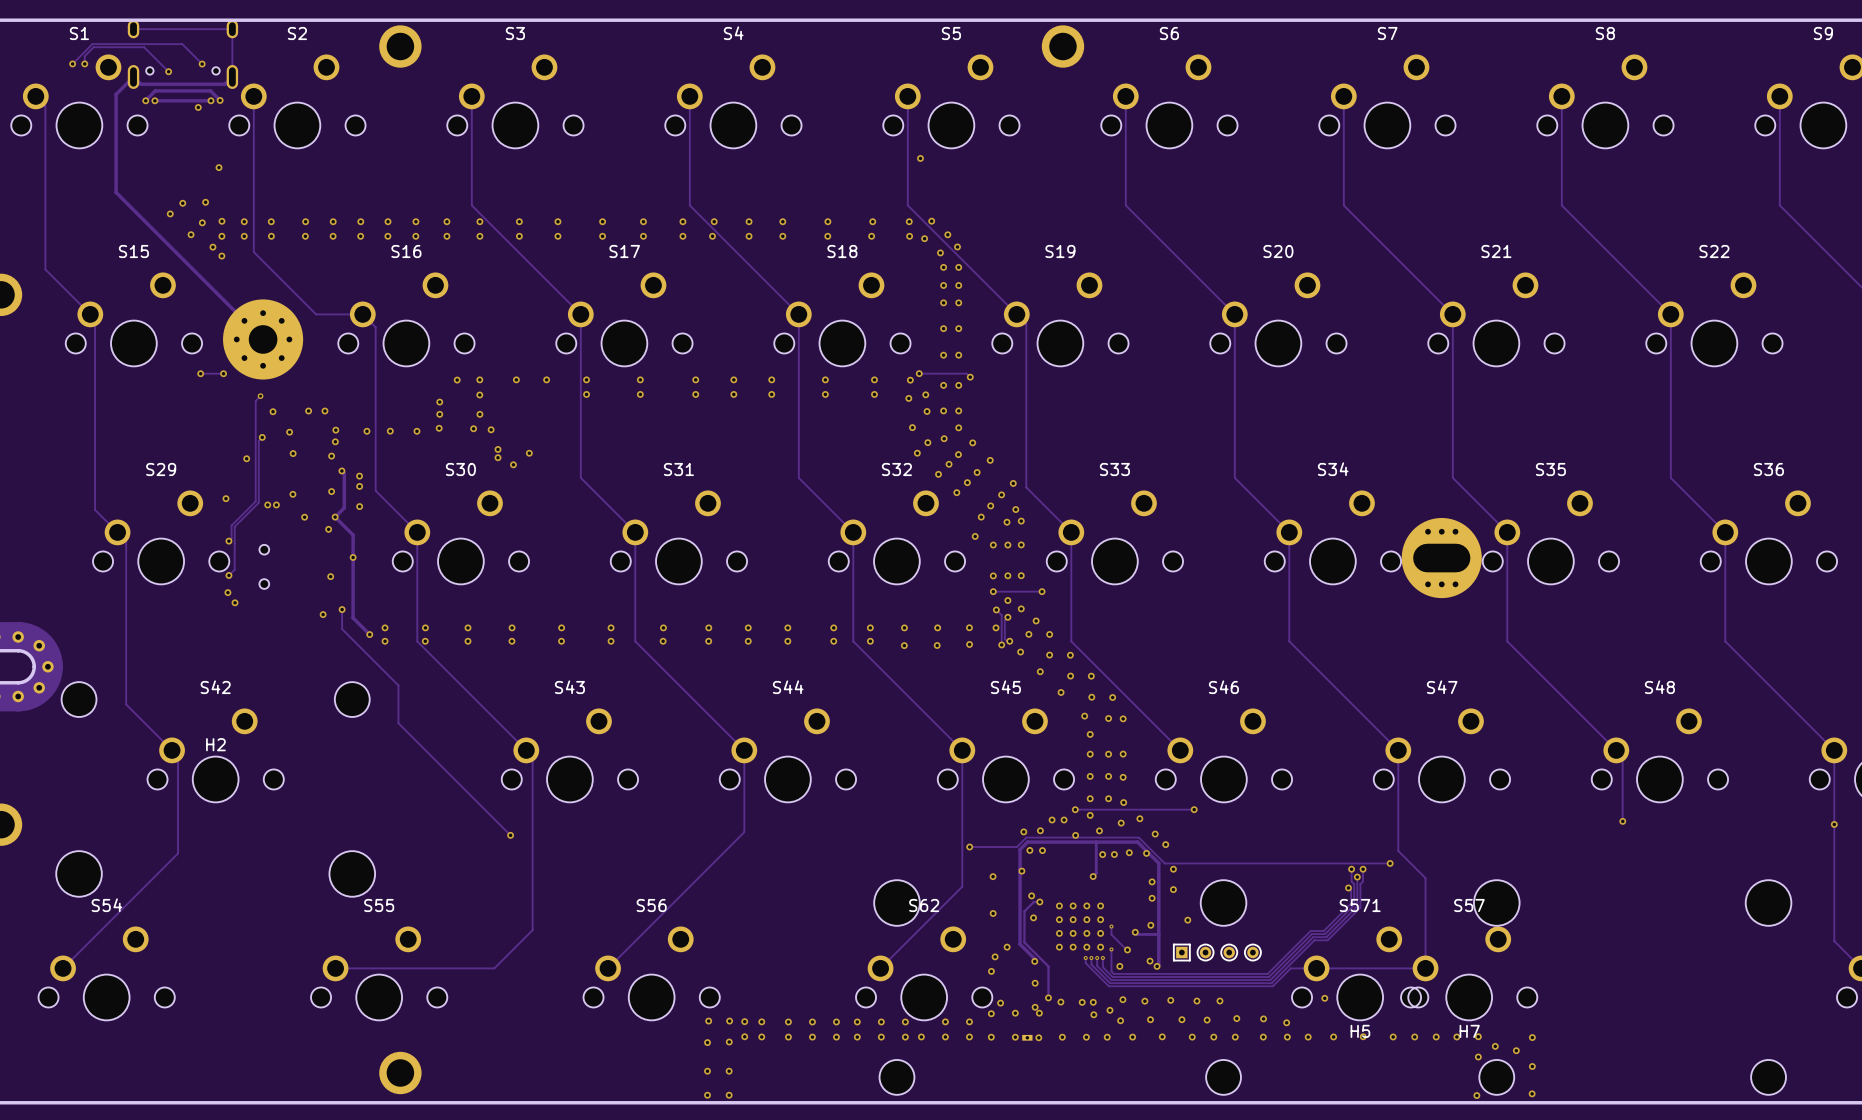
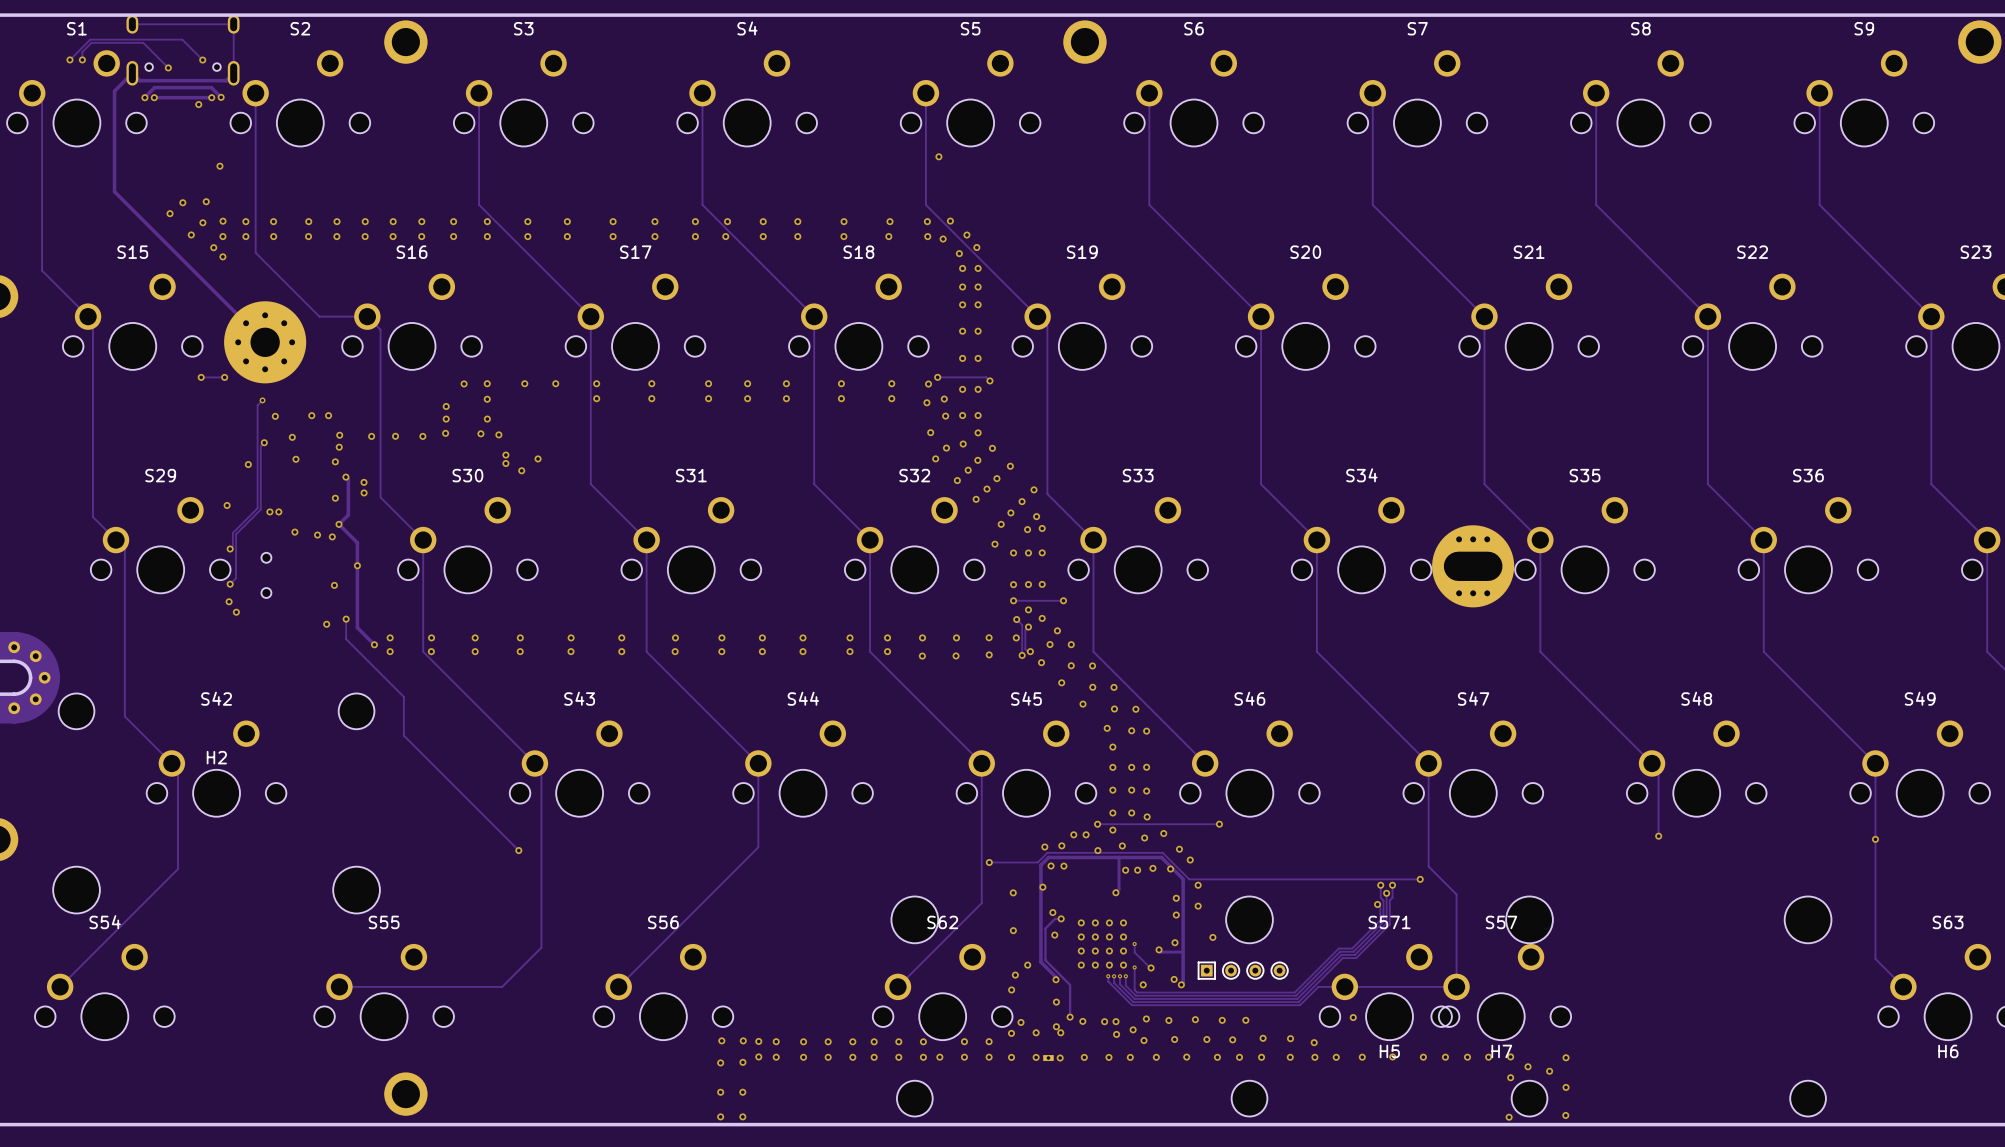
via: (292, 494) -> none
via: (359, 506) -> none
via: (304, 517) -> none
via: none -> (294, 532)
via: none -> (317, 535)

